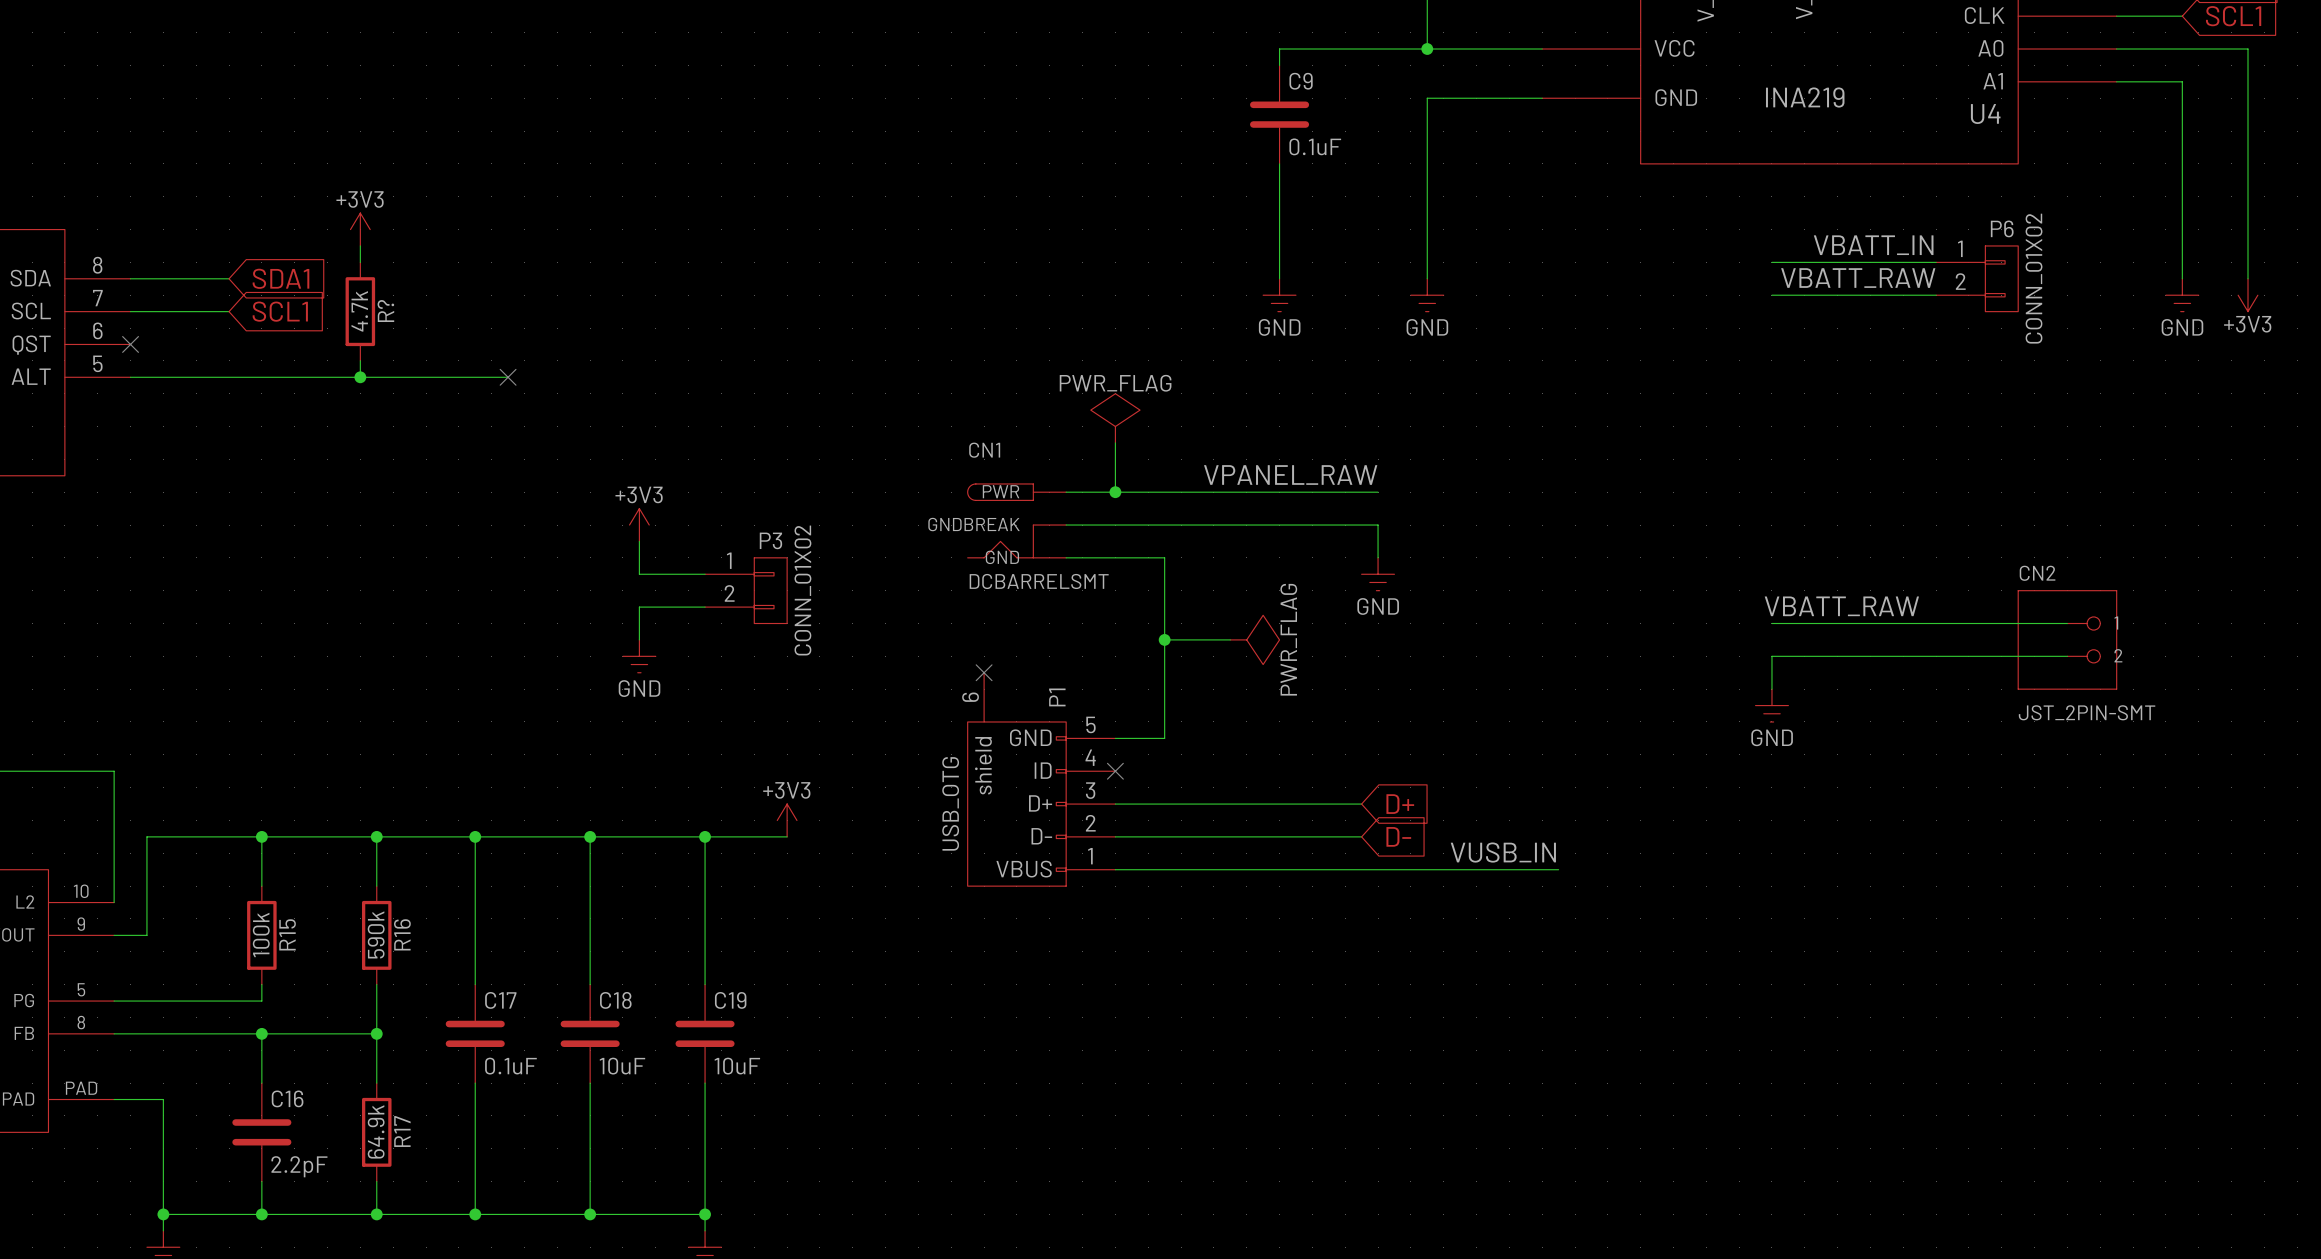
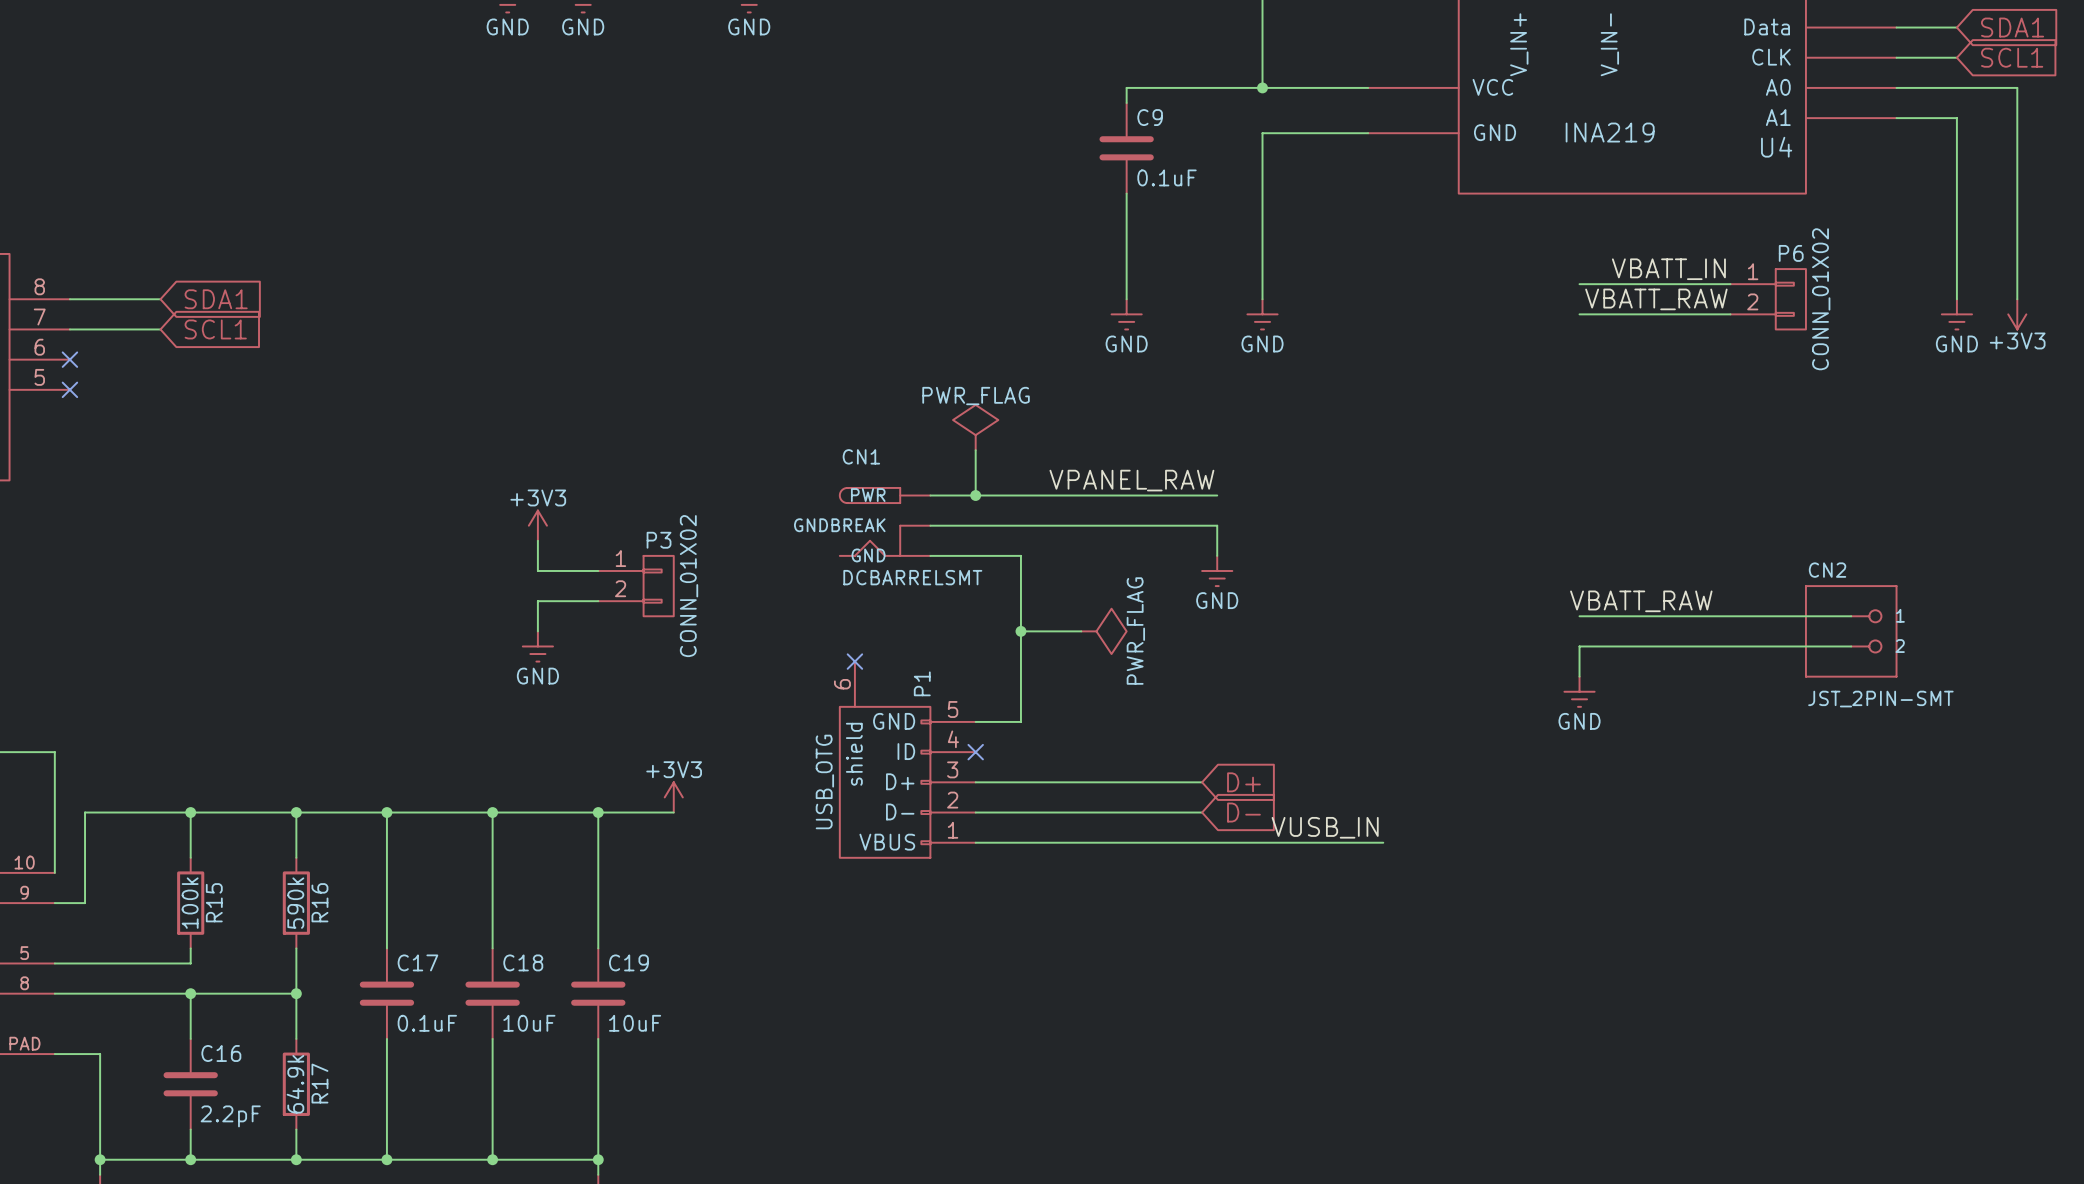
power symbol: +3V3 (360, 229) -> none
wire: (360, 245) (360, 262) -> none
R?: 4.7k (360, 311) -> none
wire: (360, 360) (360, 377) -> none
wire: (130, 377) (508, 377) -> none
no-connect mark: none -> (69, 389)
junction: (360, 377) -> none
no-connect mark: (508, 377) -> none

